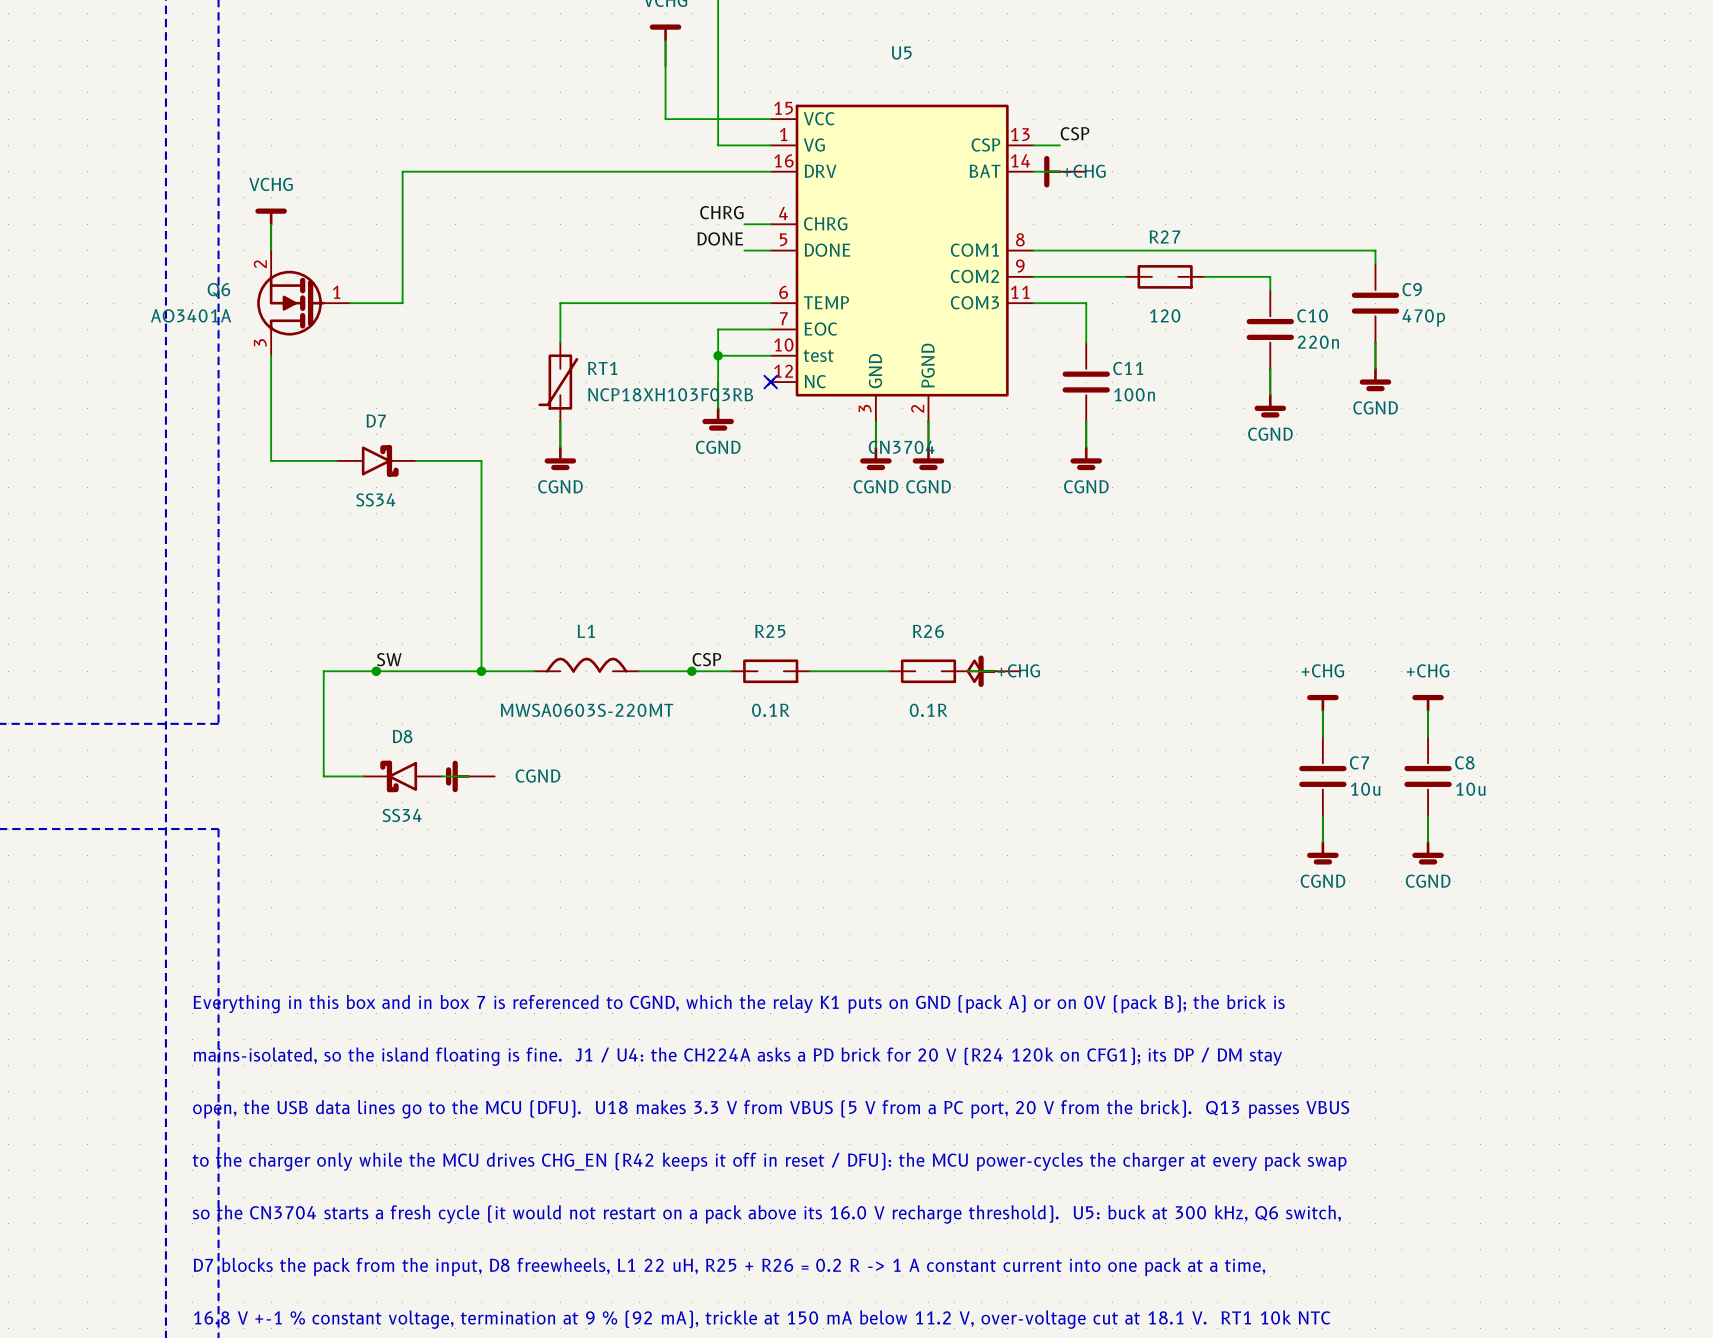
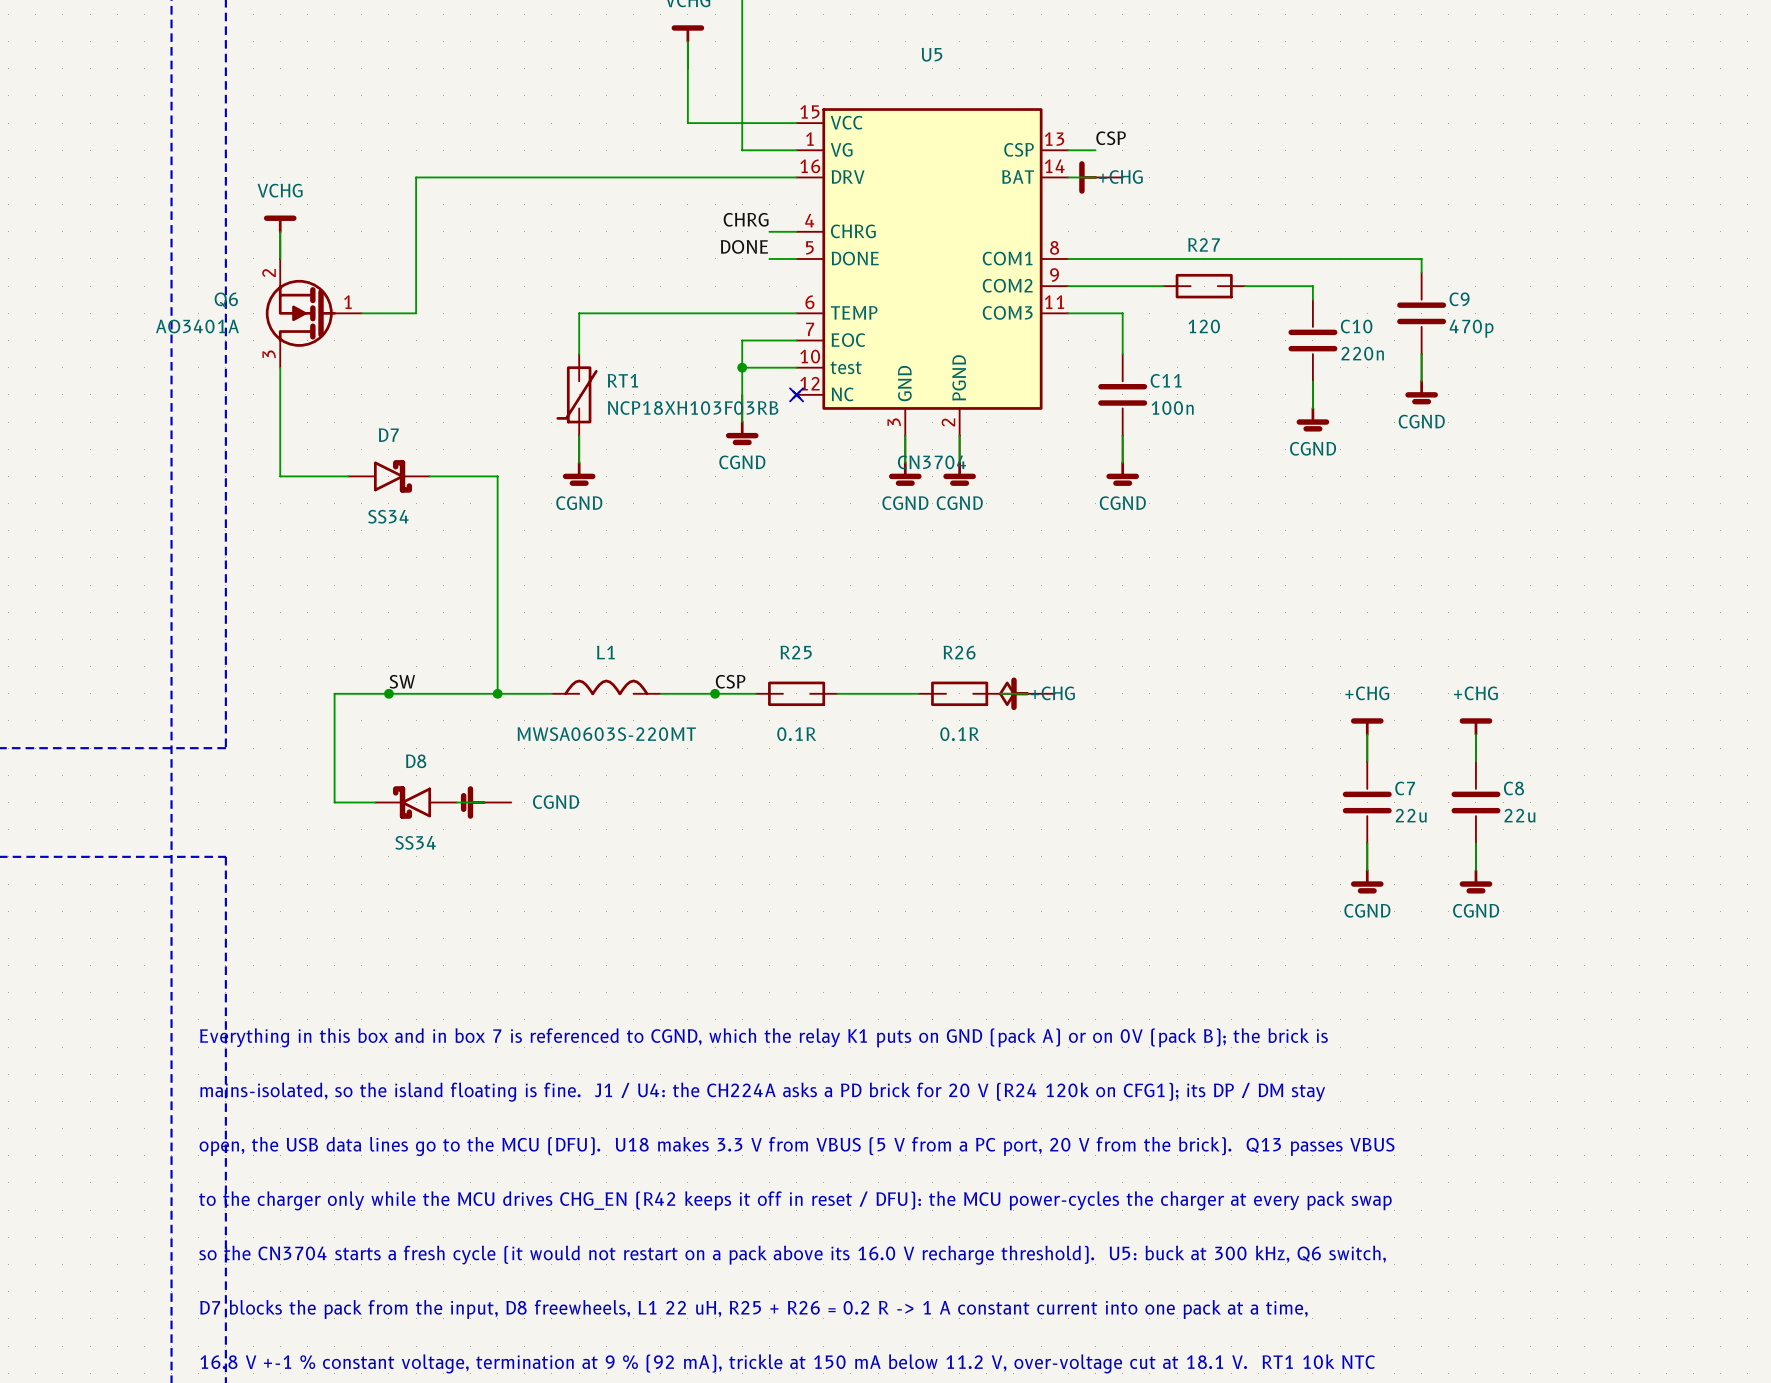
C7 value: 10u (1365, 789) -> 22u (1411, 815)
C8 value: 10u (1470, 789) -> 22u (1519, 815)

